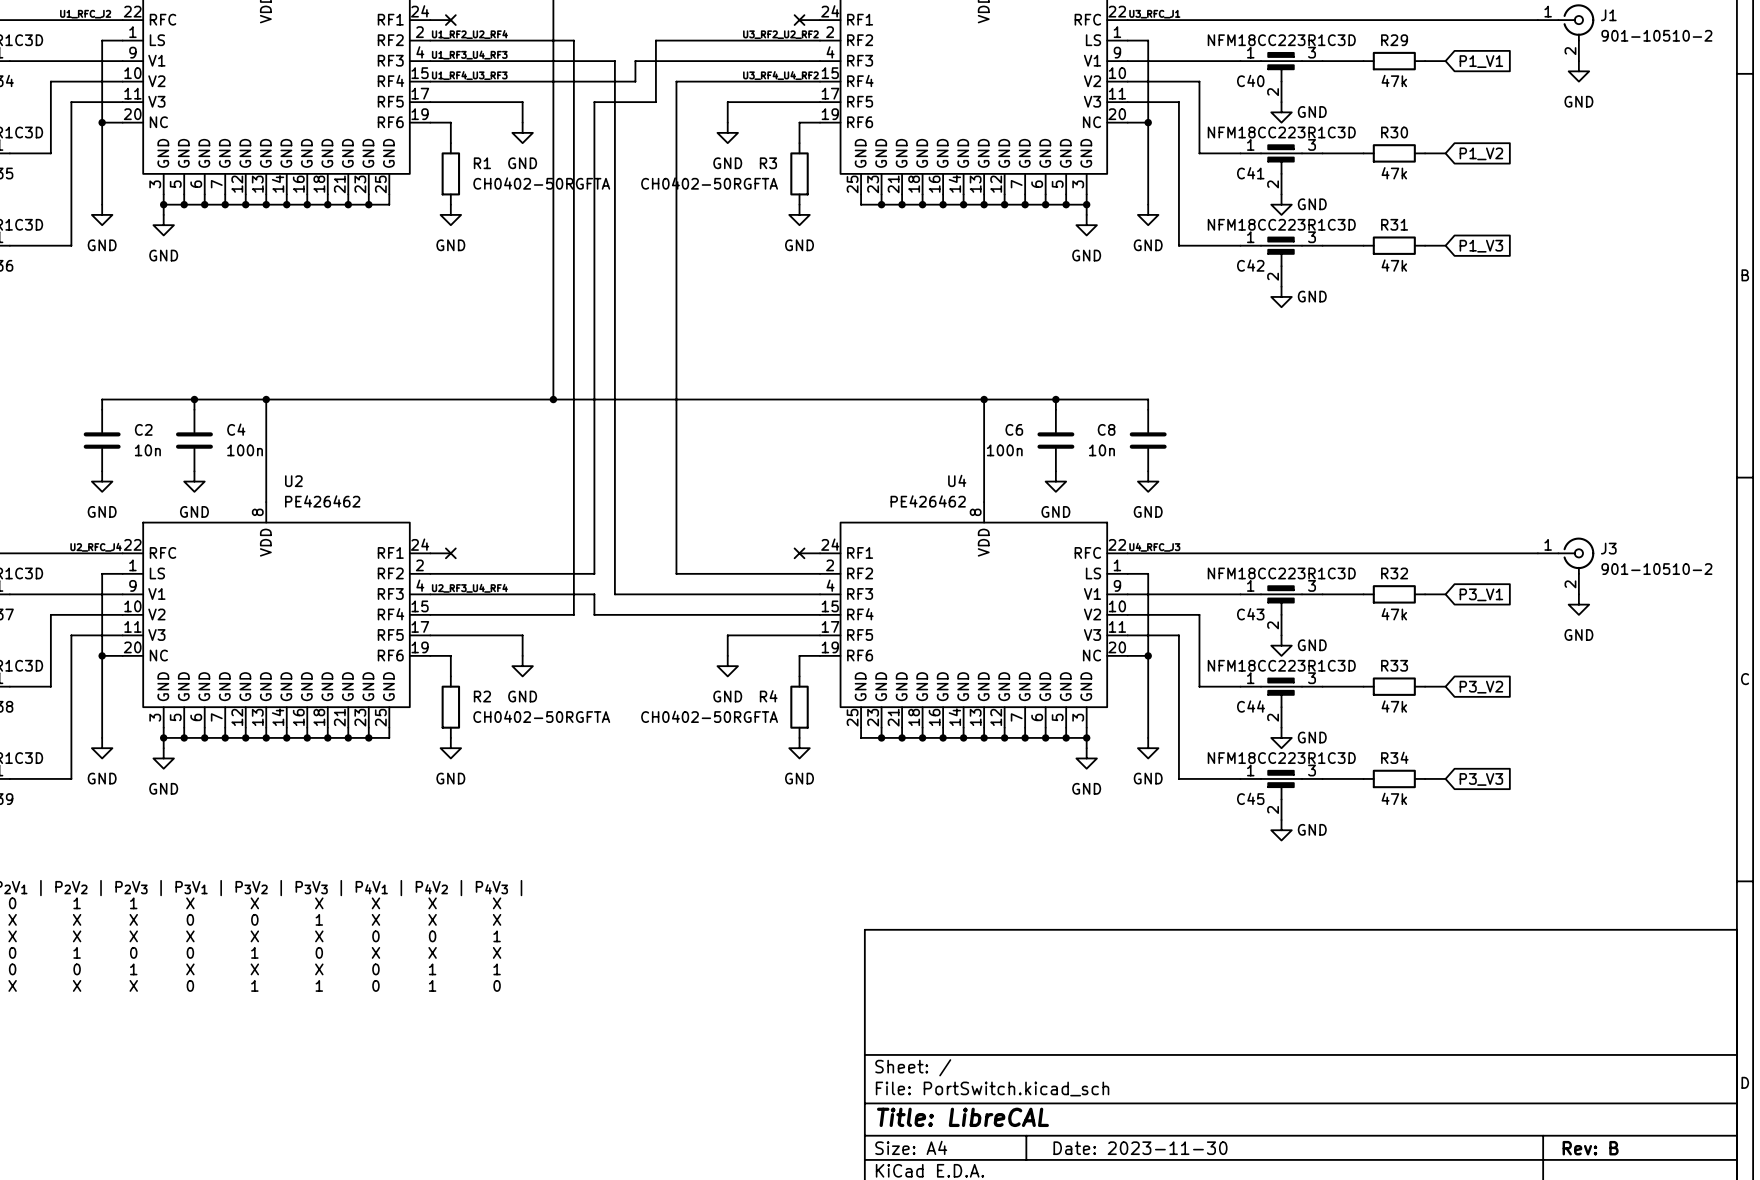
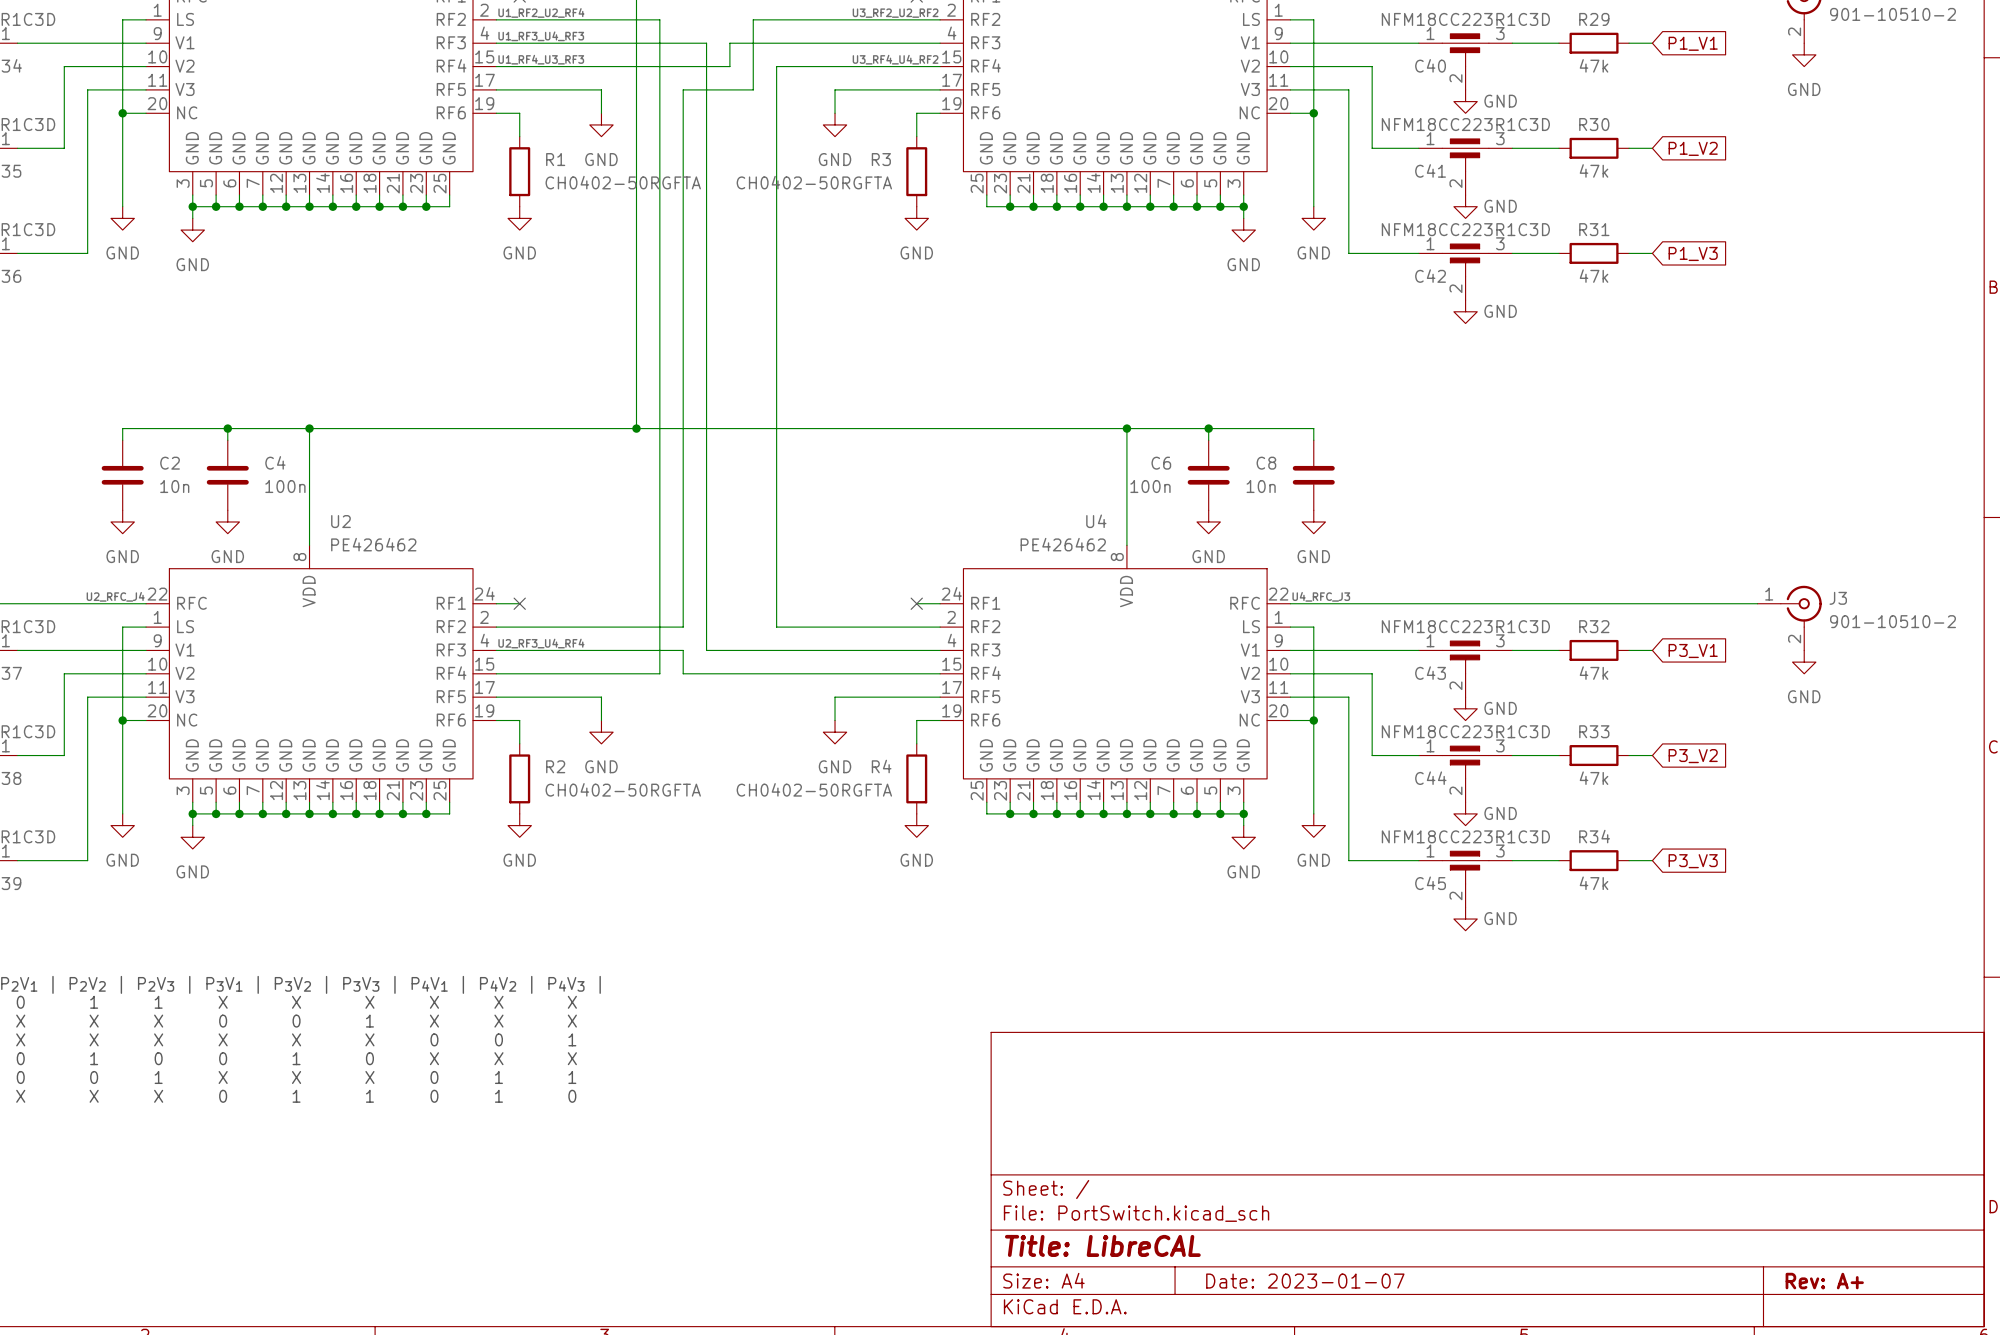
title block: Date: 2023-11-30 (1140, 1148) -> Date: 2023-01-07 (1305, 1281)
title block: Rev: B (1590, 1148) -> Rev: A+ (1824, 1281)

